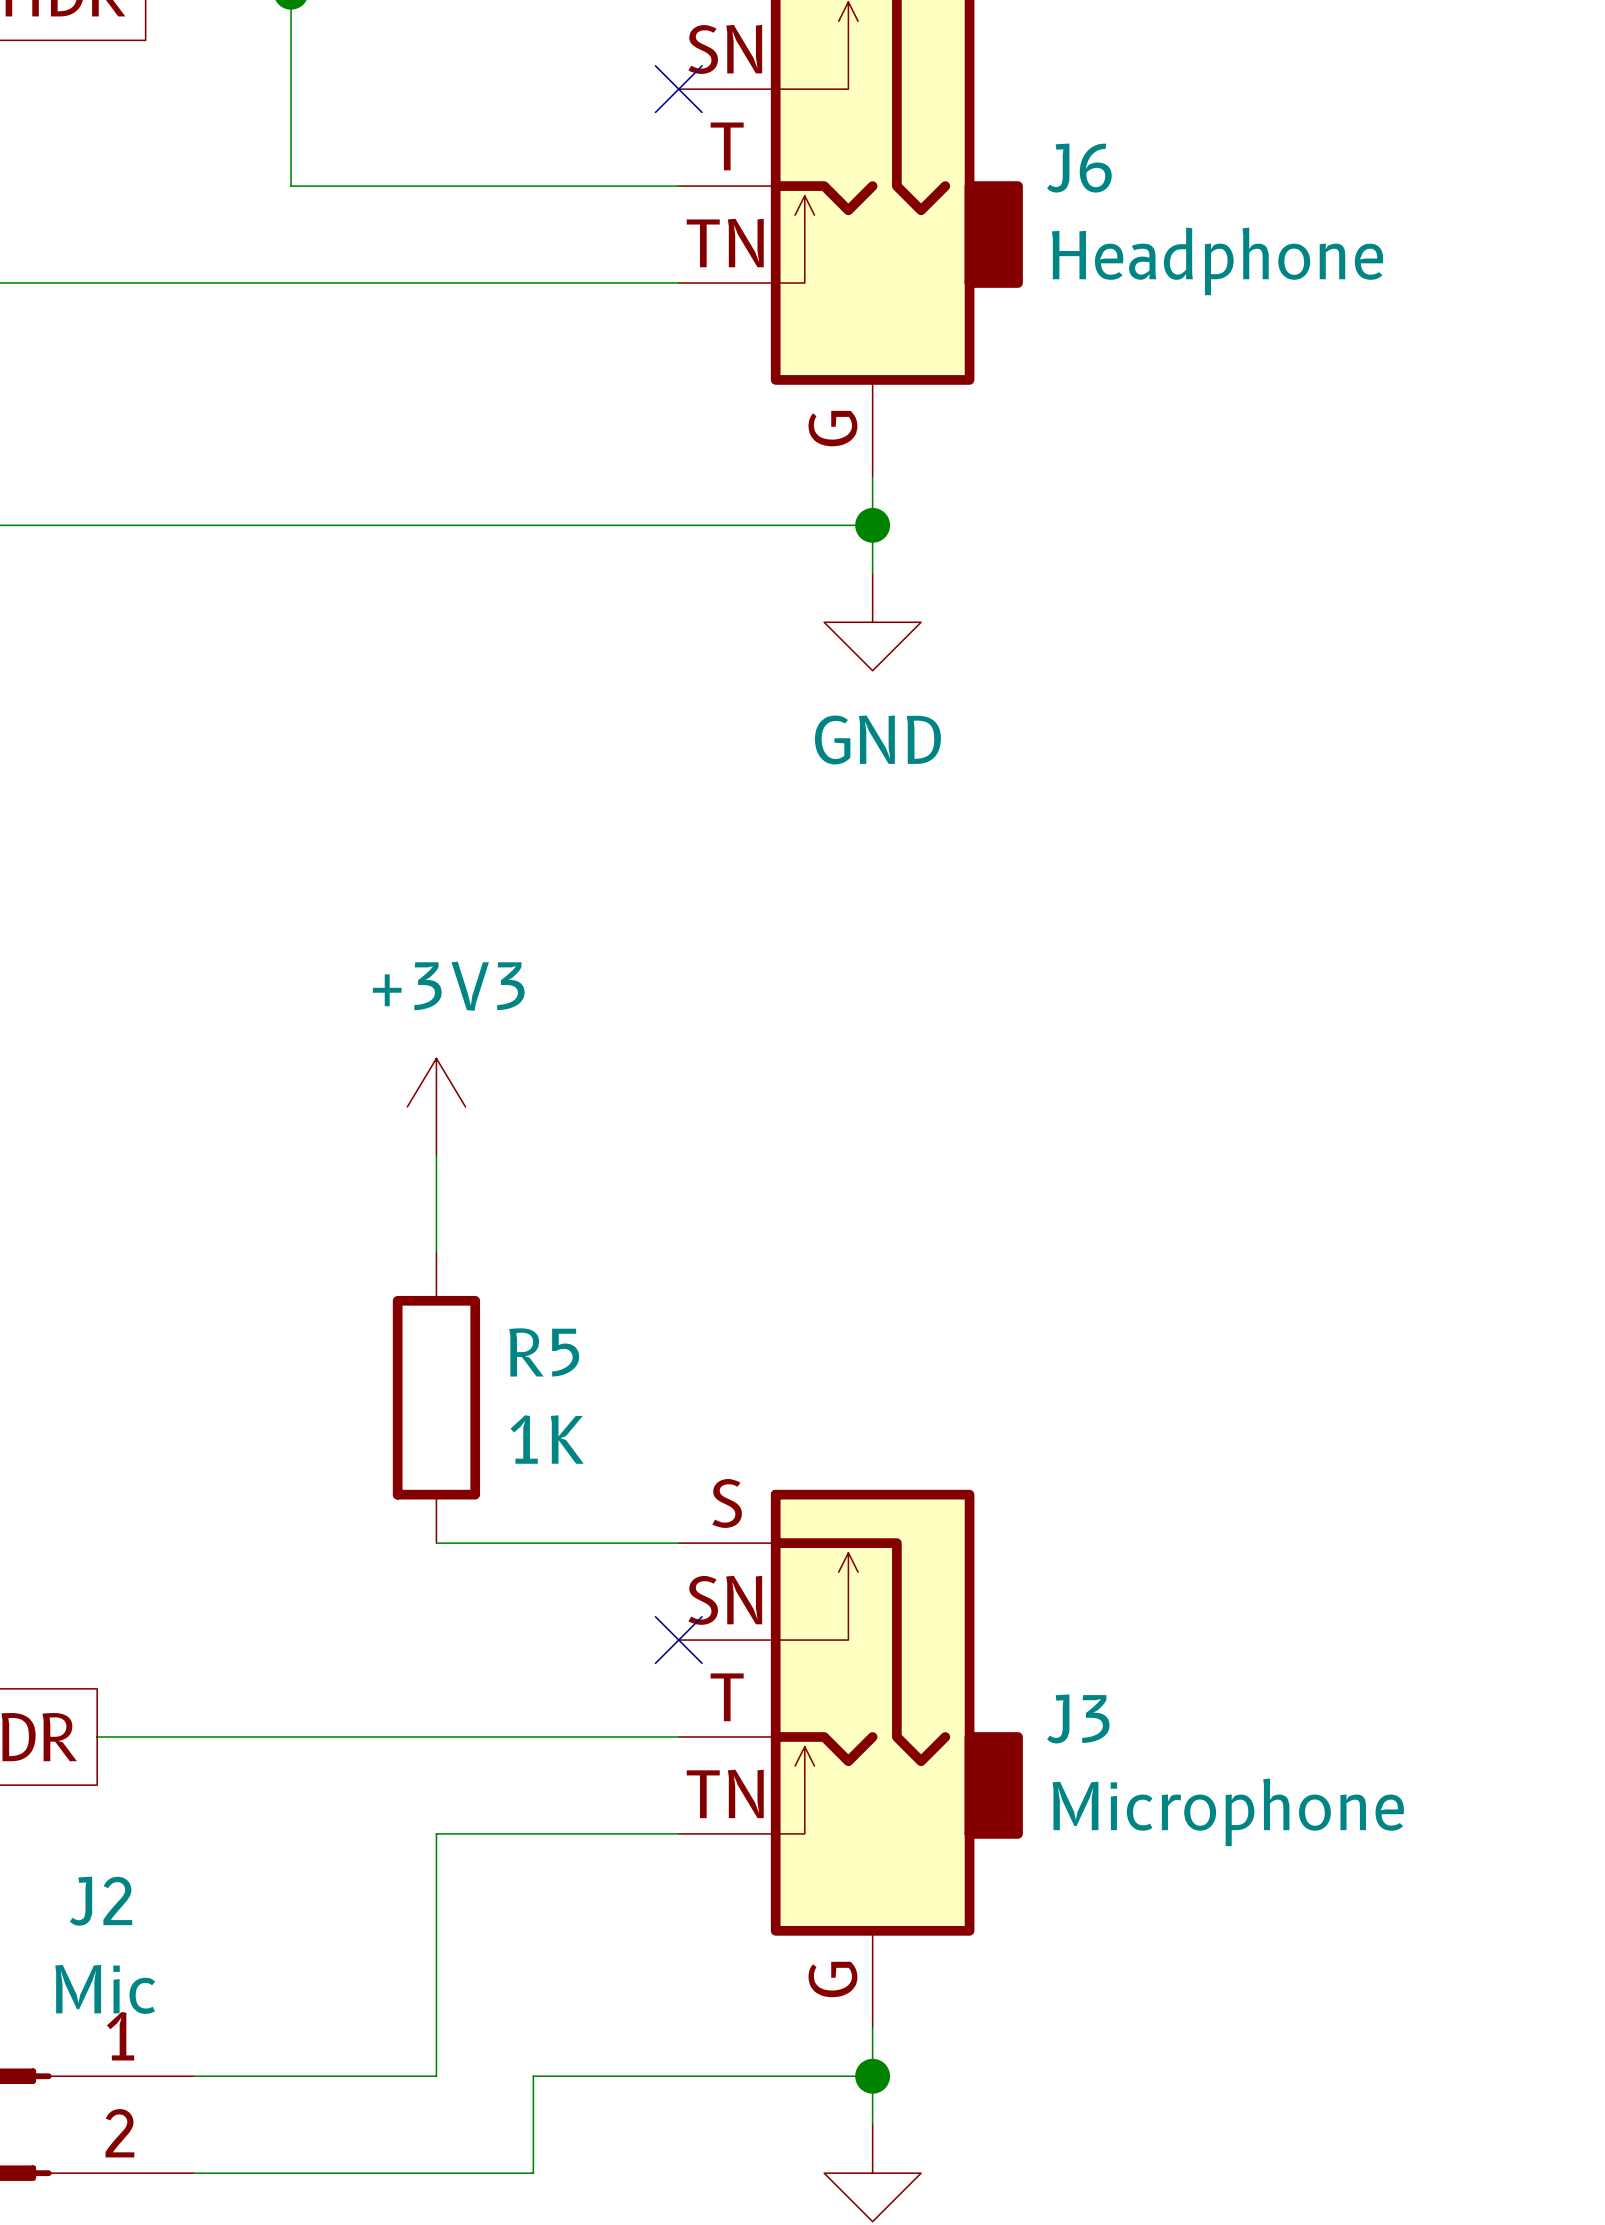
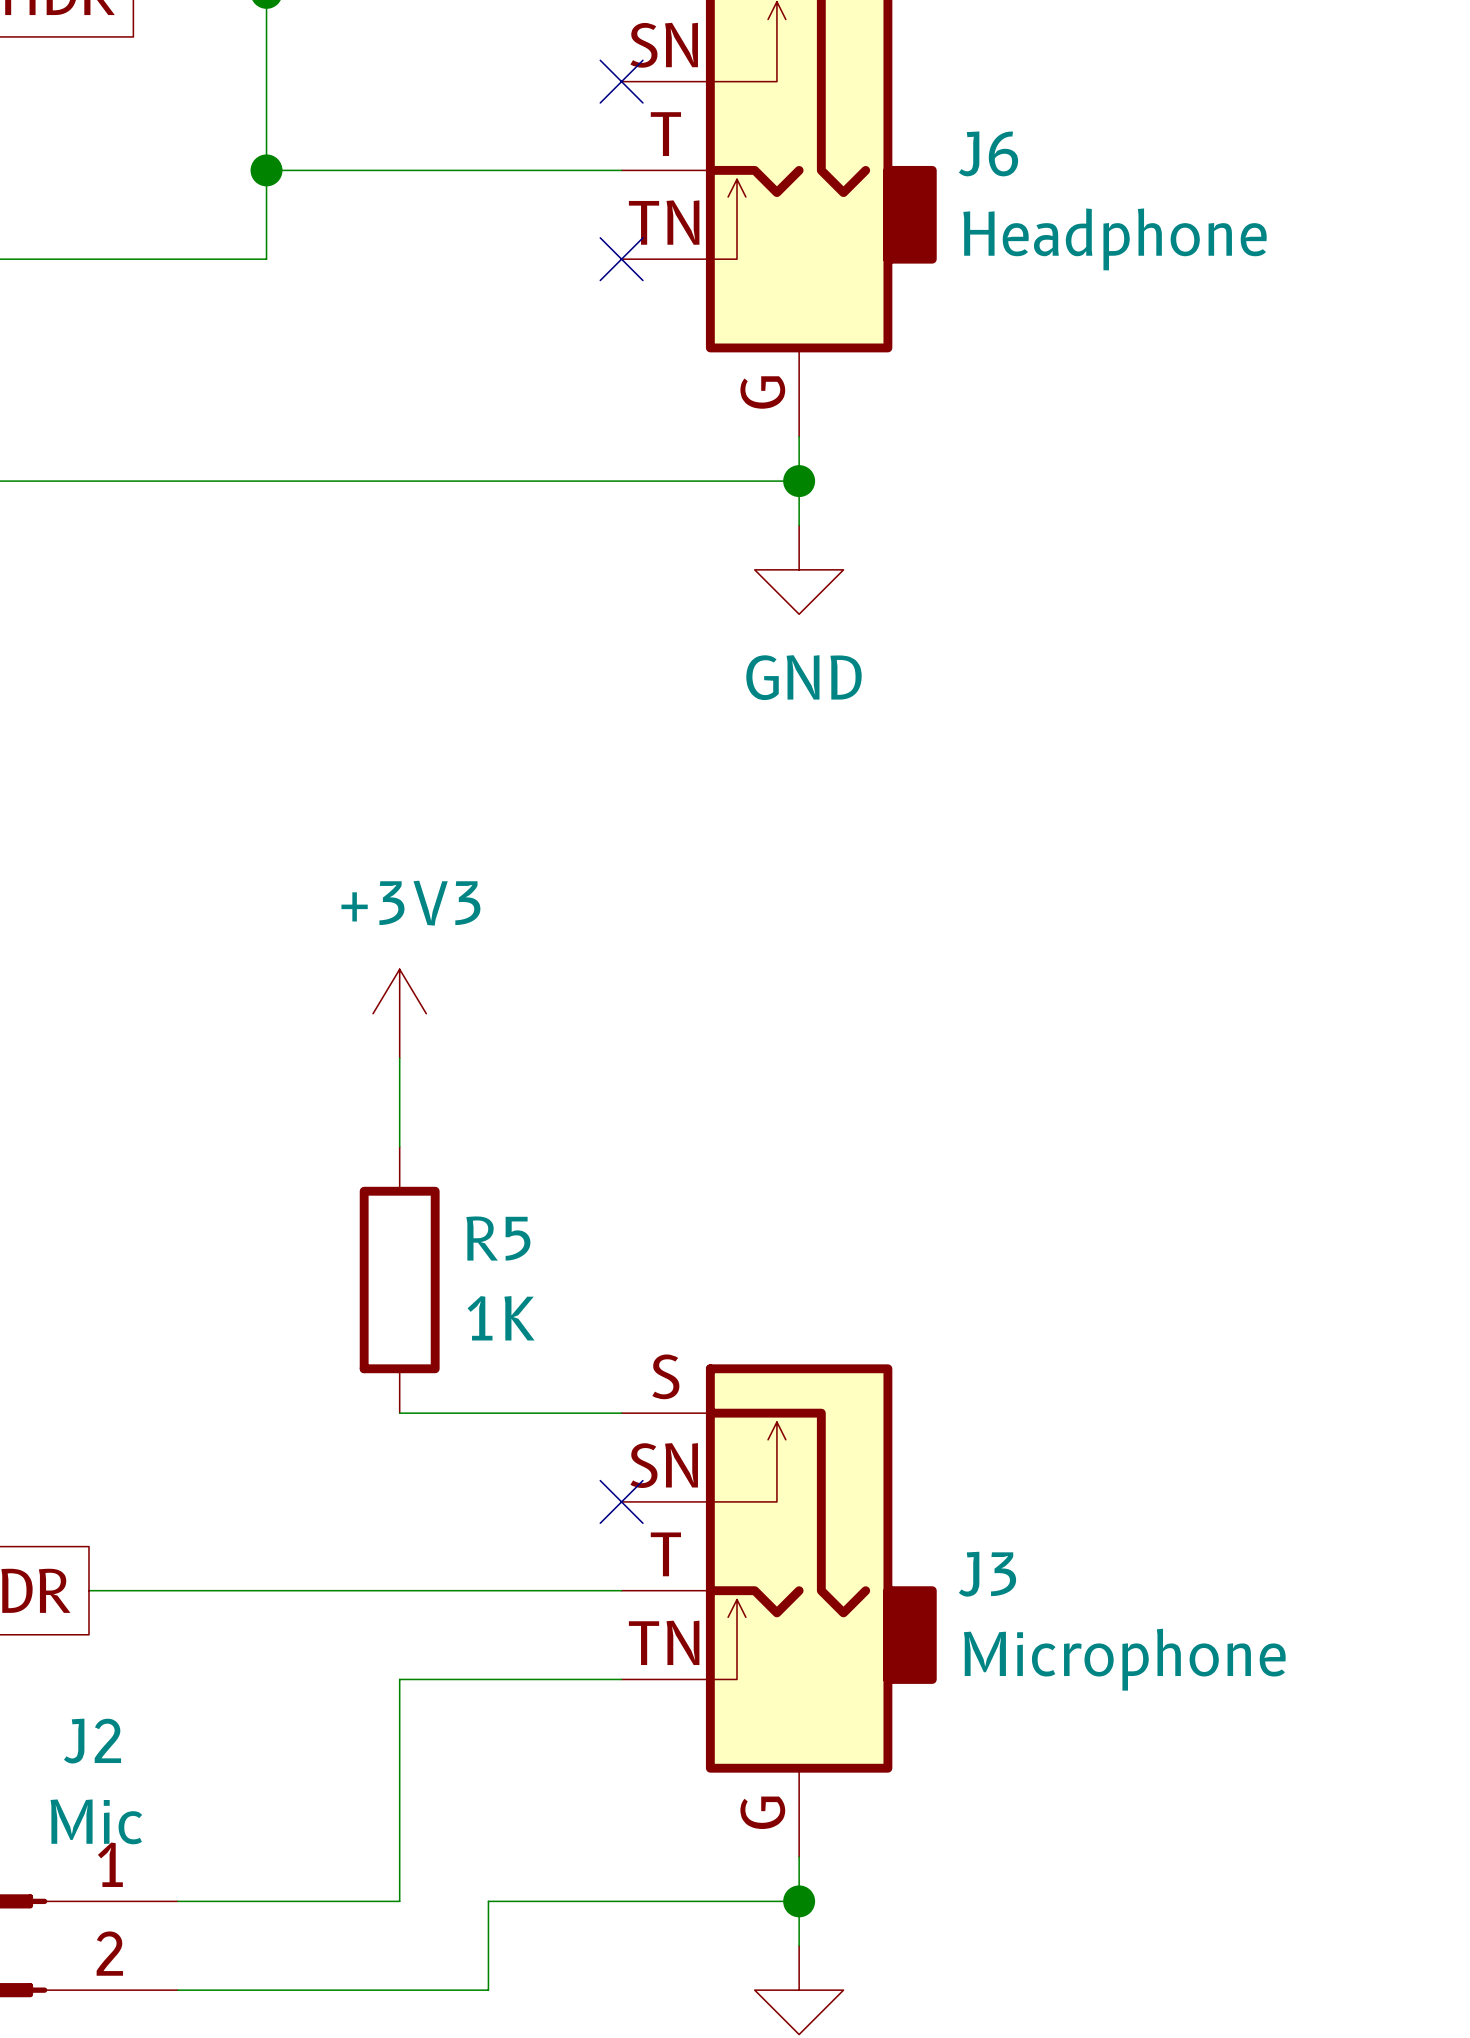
junction: none -> (266, 170)
wire: (291, 283) (678, 283) -> (266, 259) (266, 170)
no-connect mark: none -> (621, 259)

